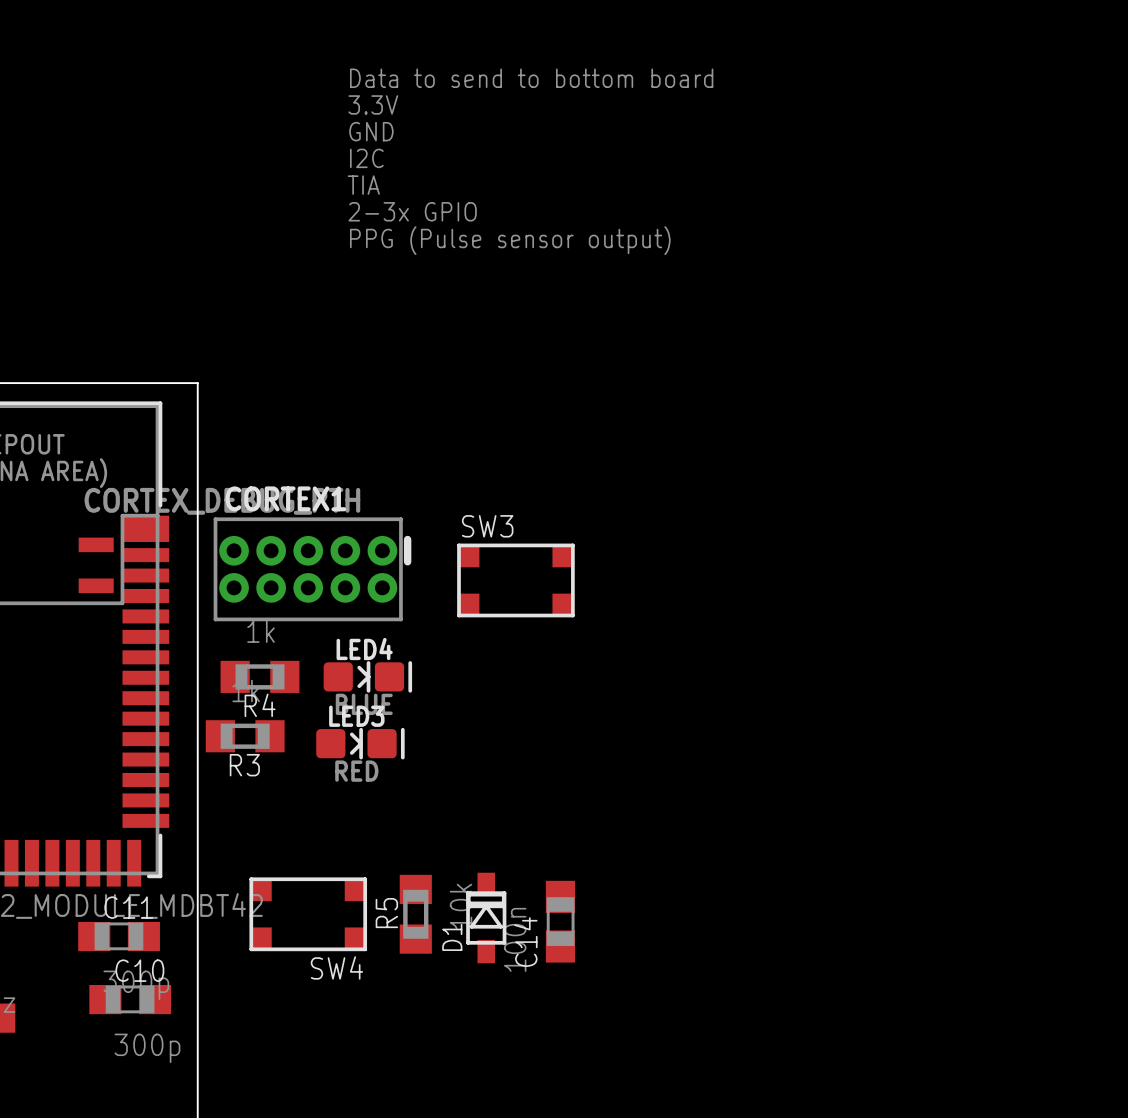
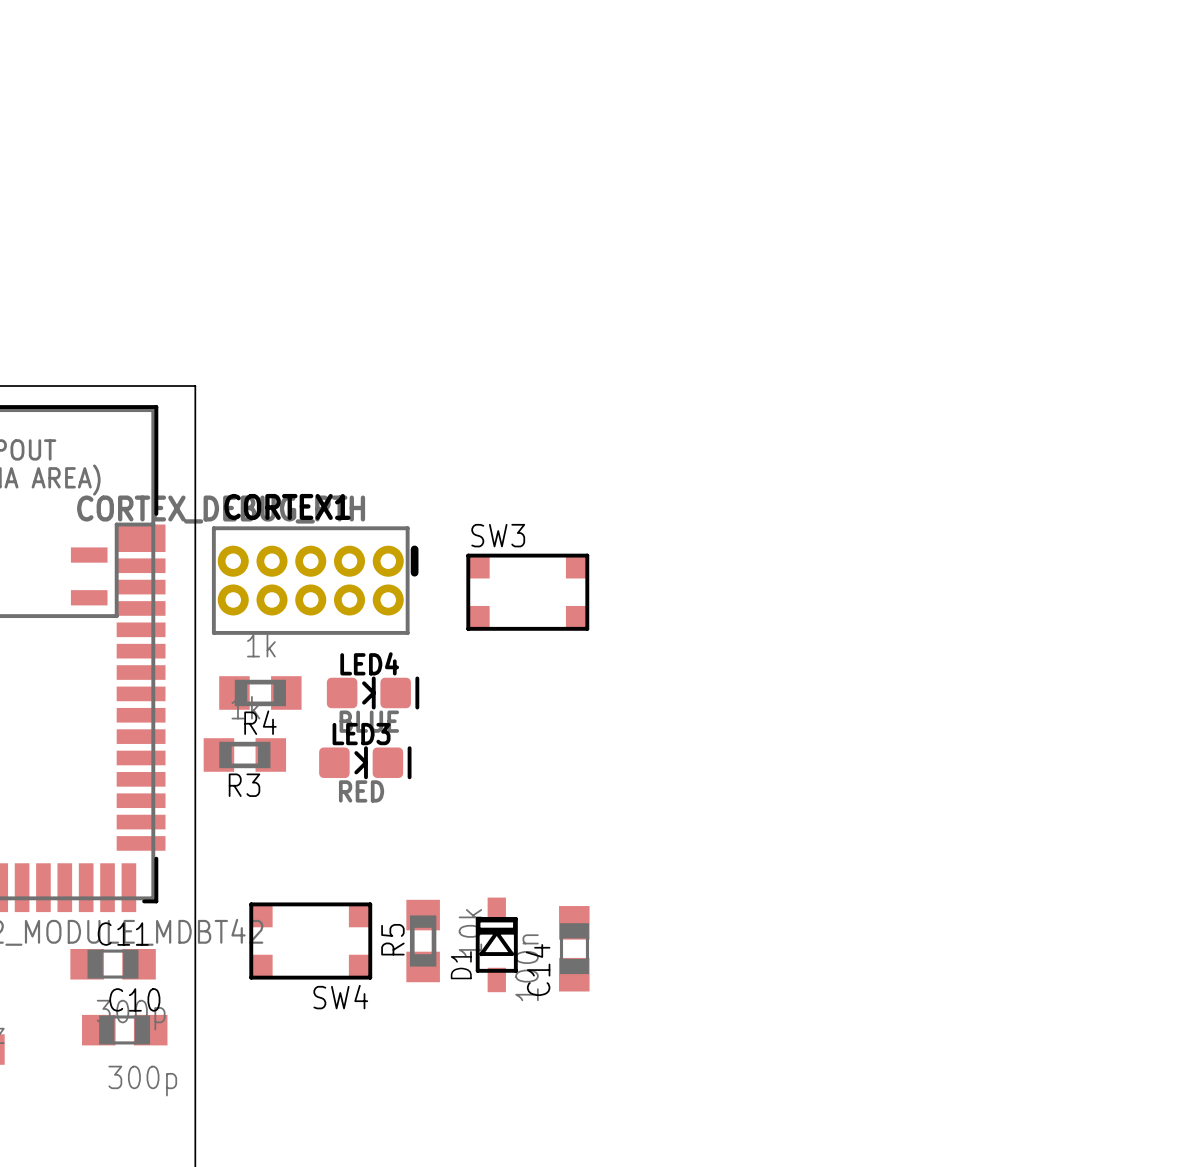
text: Data to send to bottom board (531, 78) -> none
text: 3.3V (373, 104) -> none
text: GND (371, 131) -> none
text: I2C (366, 158) -> none
text: TIA (363, 185) -> none
text: 2-3x GPIO (412, 211) -> none
text: PPG (Pulse sensor output) (510, 240) -> none

